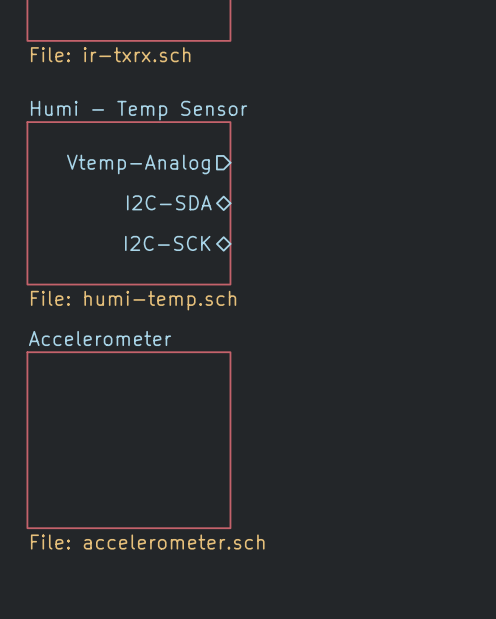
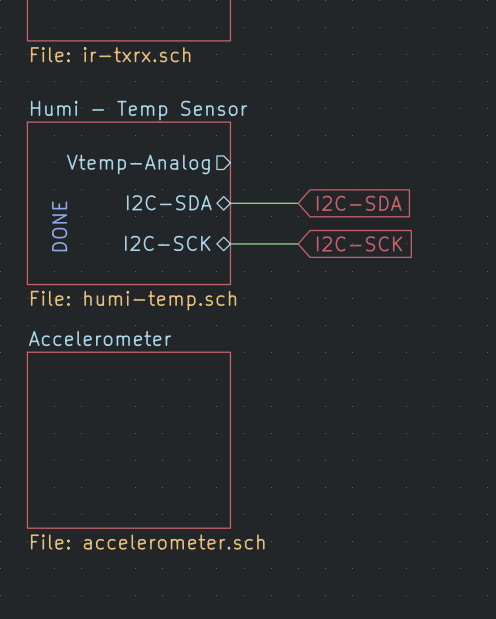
wire: none -> (230, 203) (298, 203)
global label: none -> I2C-SDA (359, 203)
text: none -> DONE (59, 226)
wire: none -> (230, 243) (298, 243)
global label: none -> I2C-SCK (359, 243)

